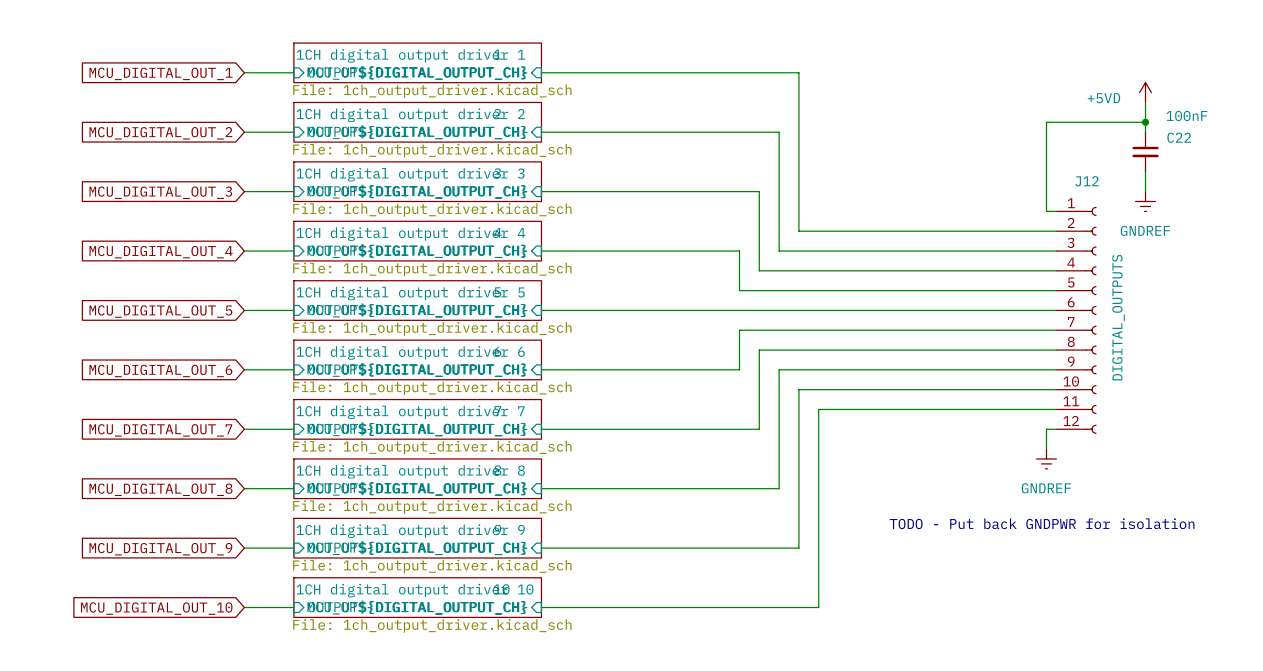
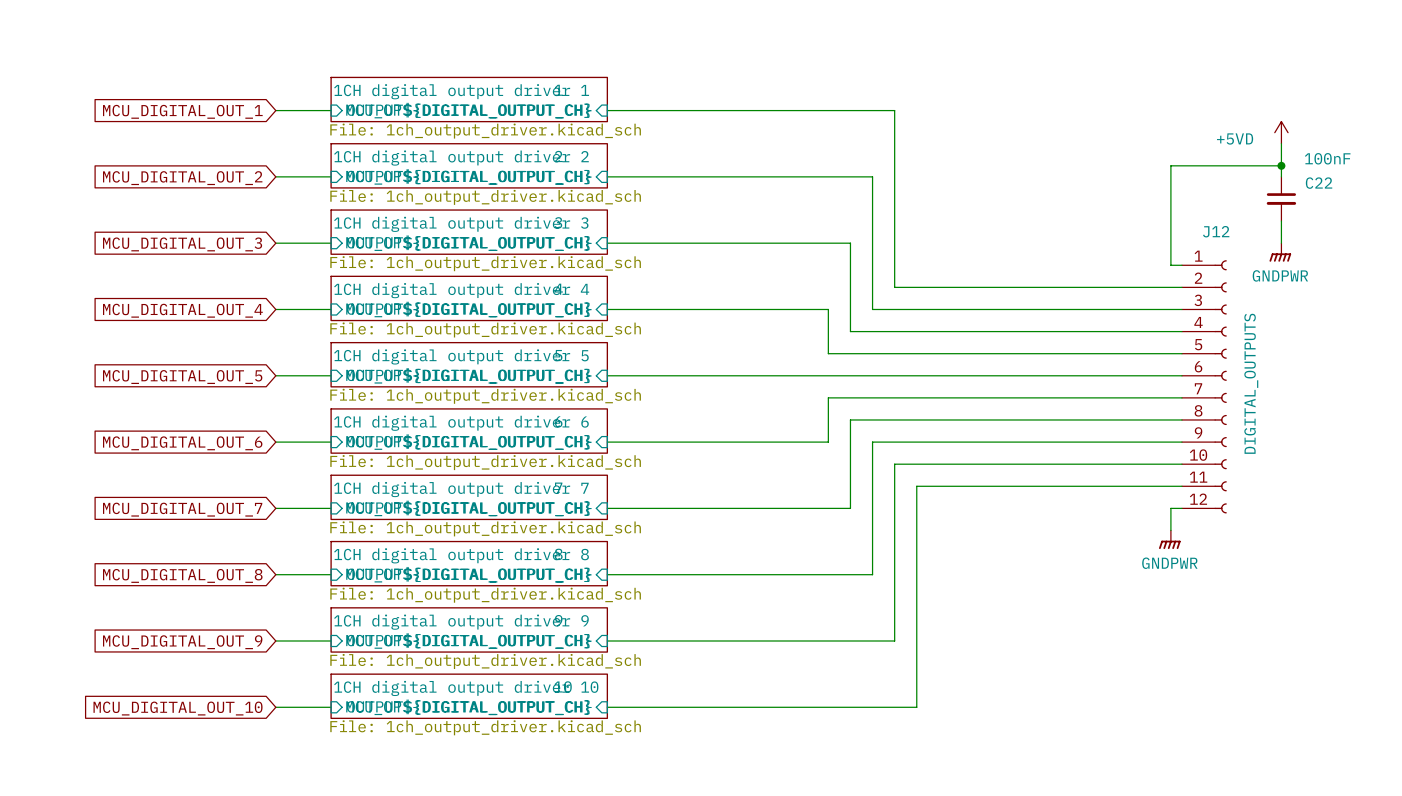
power symbol: GNDREF (1145, 201) -> GNDPWR (1280, 252)
power symbol: GNDREF (1046, 458) -> GNDPWR (1169, 539)
text: TODO - Put back GNDPWR for isolation (1042, 523) -> none

